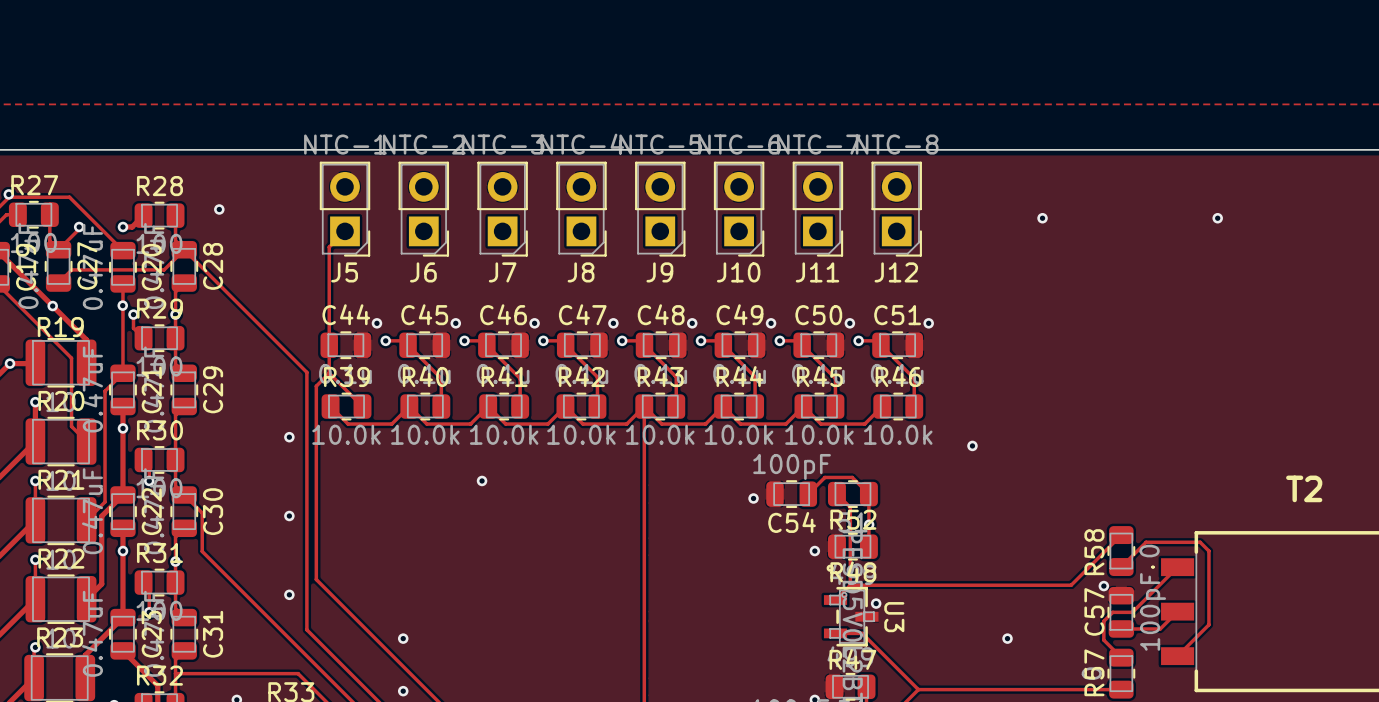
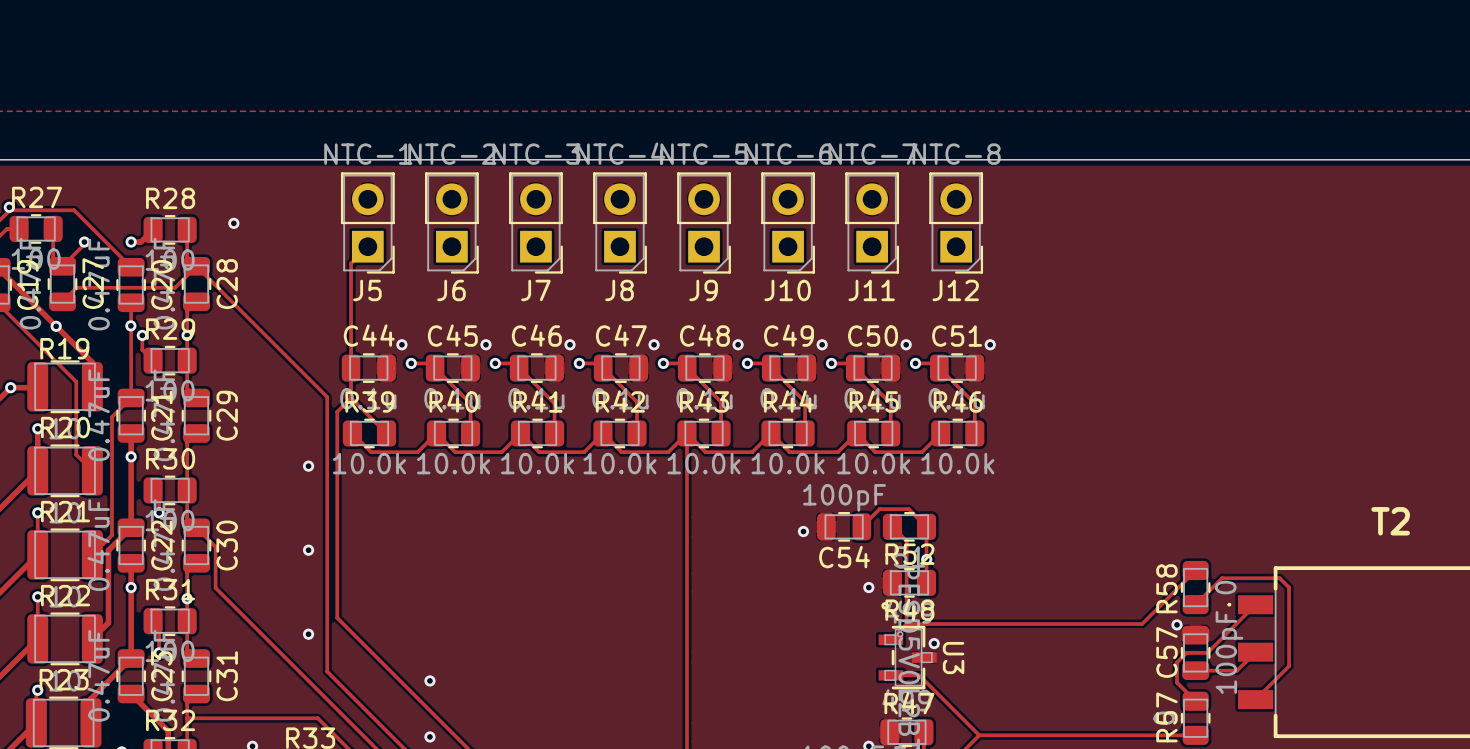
via: (1042, 218) -> none
via: (1217, 218) -> none
via: (972, 445) -> none
via: (482, 480) -> none
via: (1007, 638) -> none

